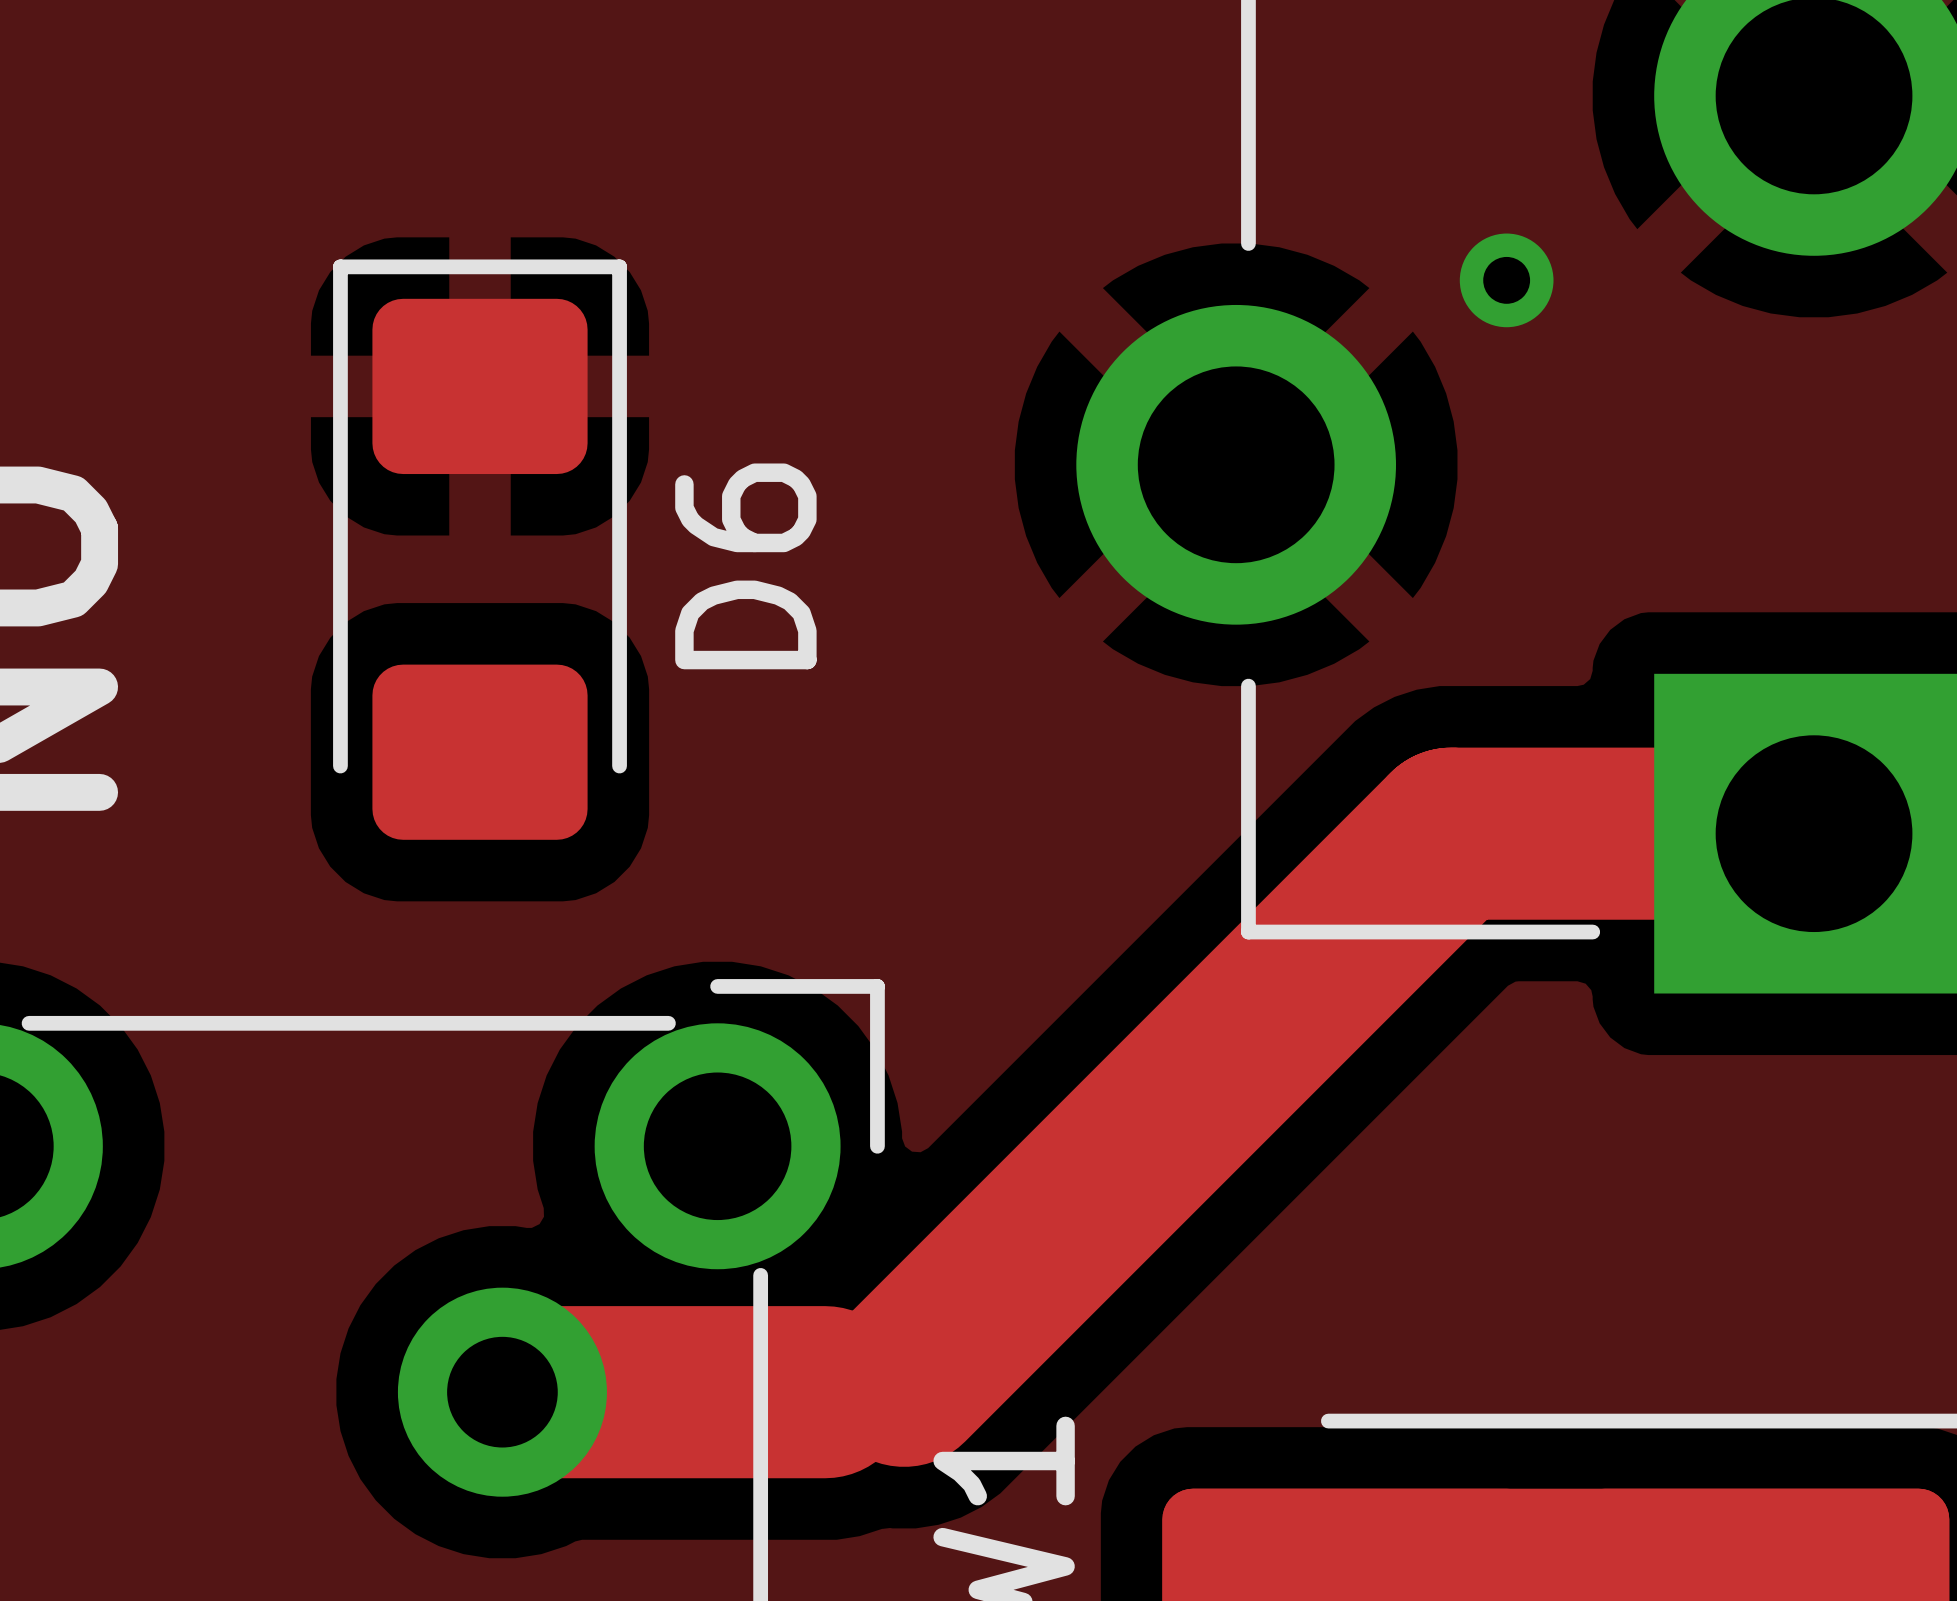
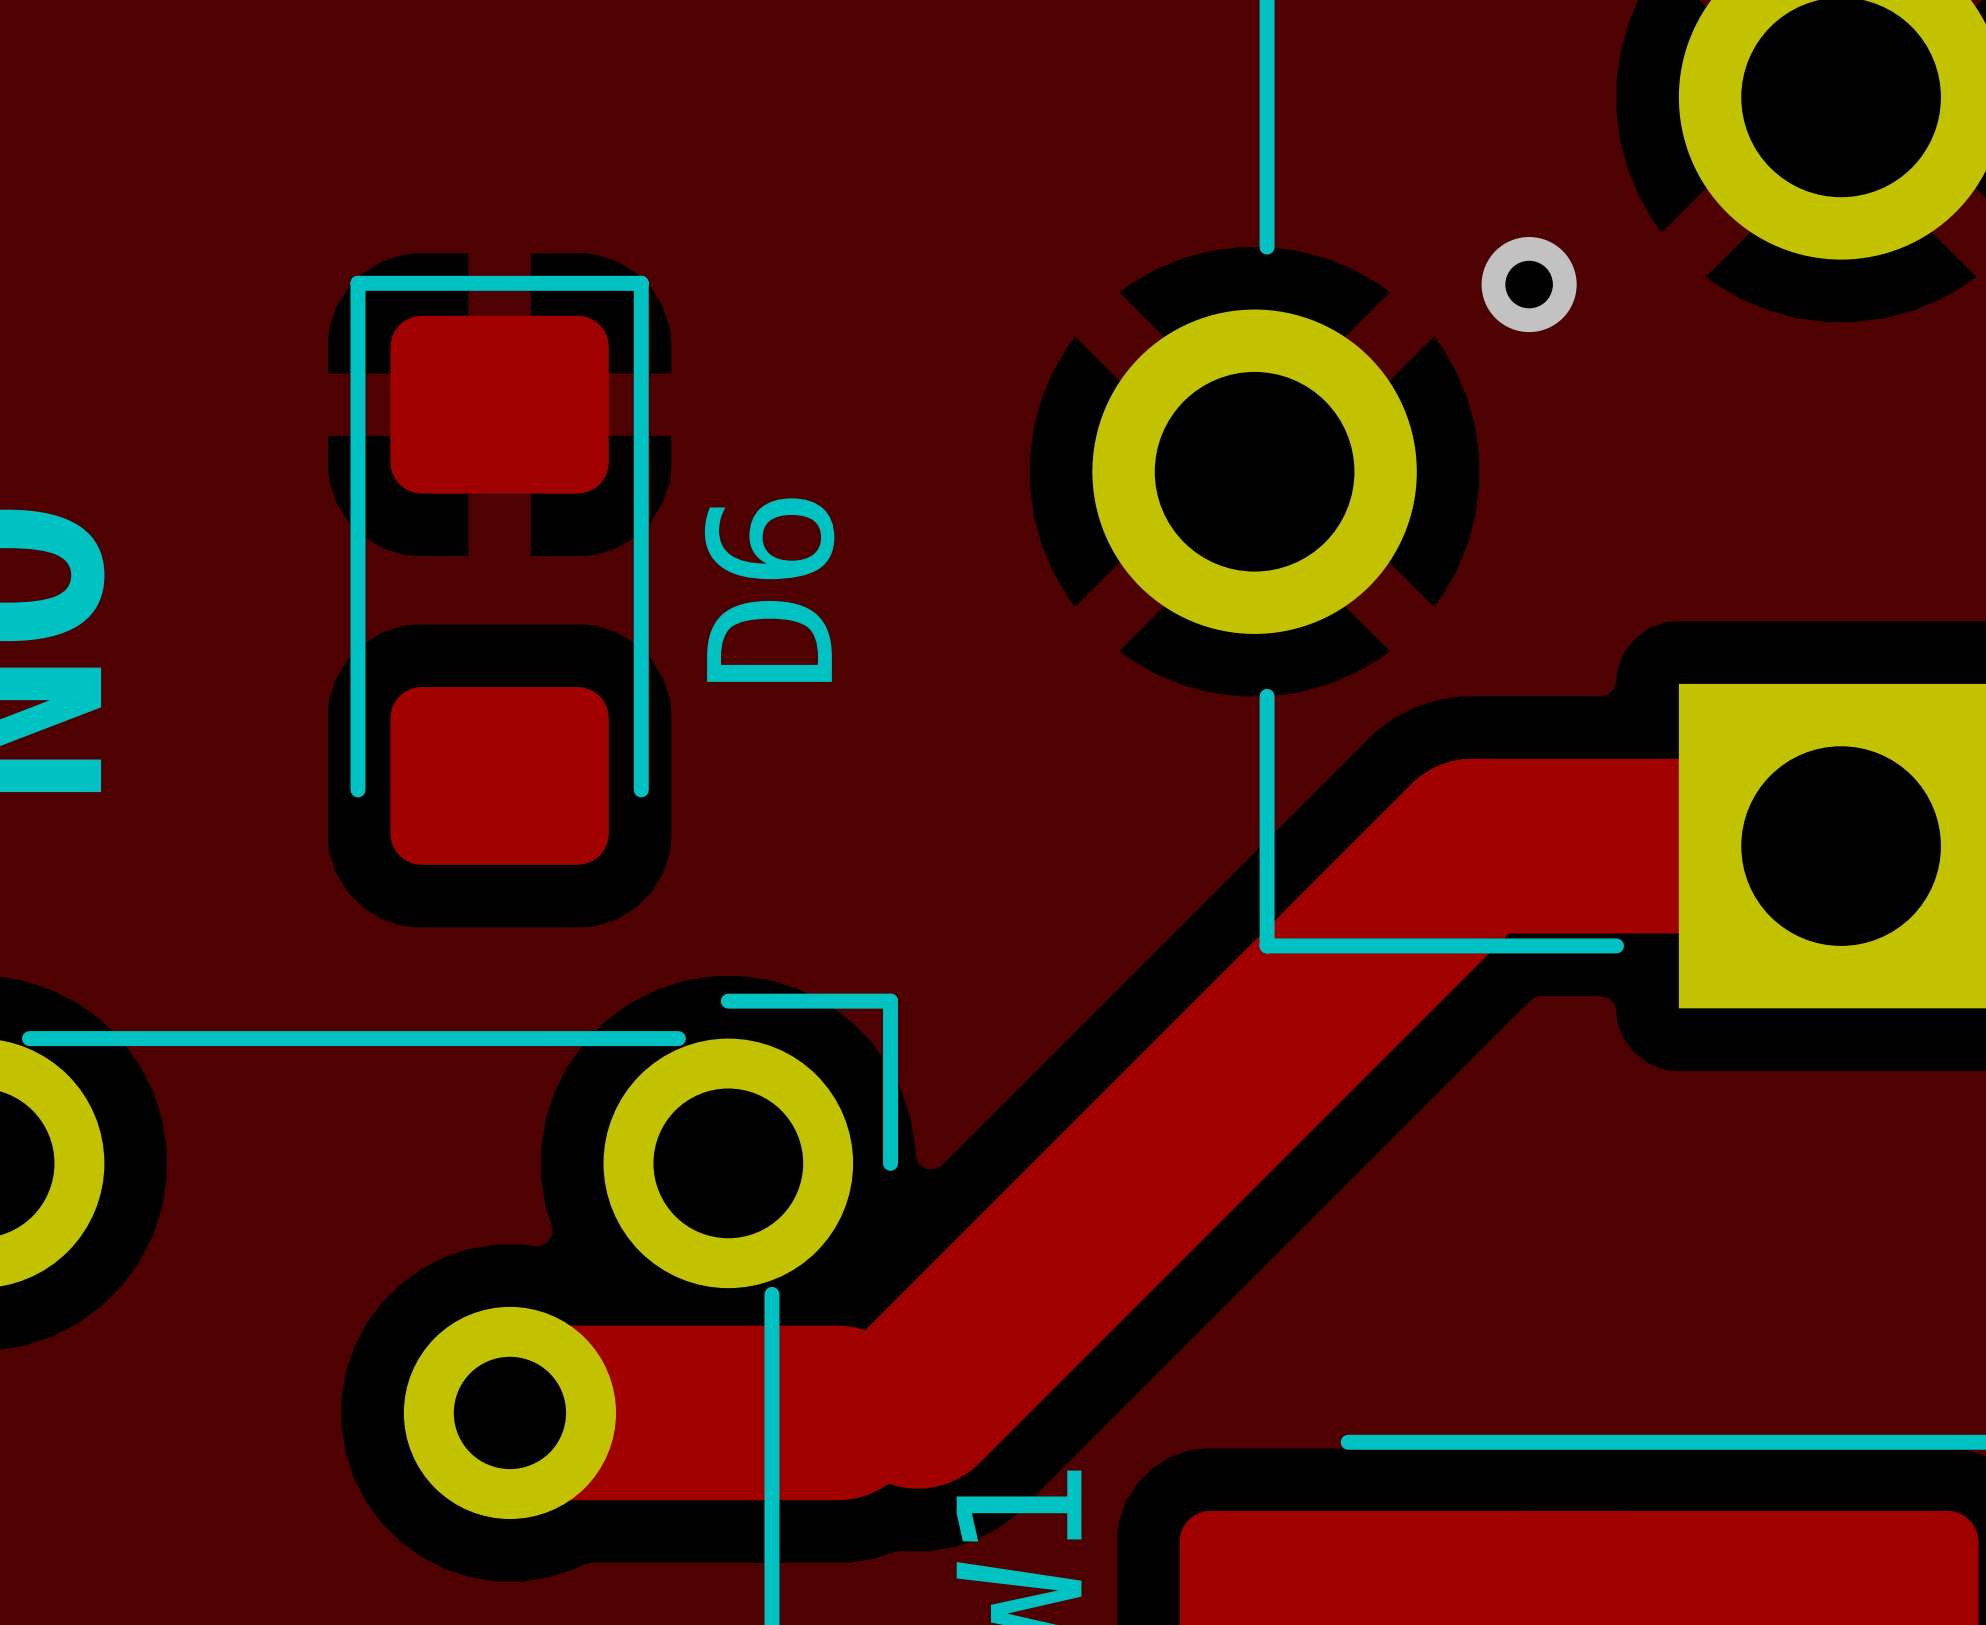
D6 position: (480, 549) -> (499, 570)

